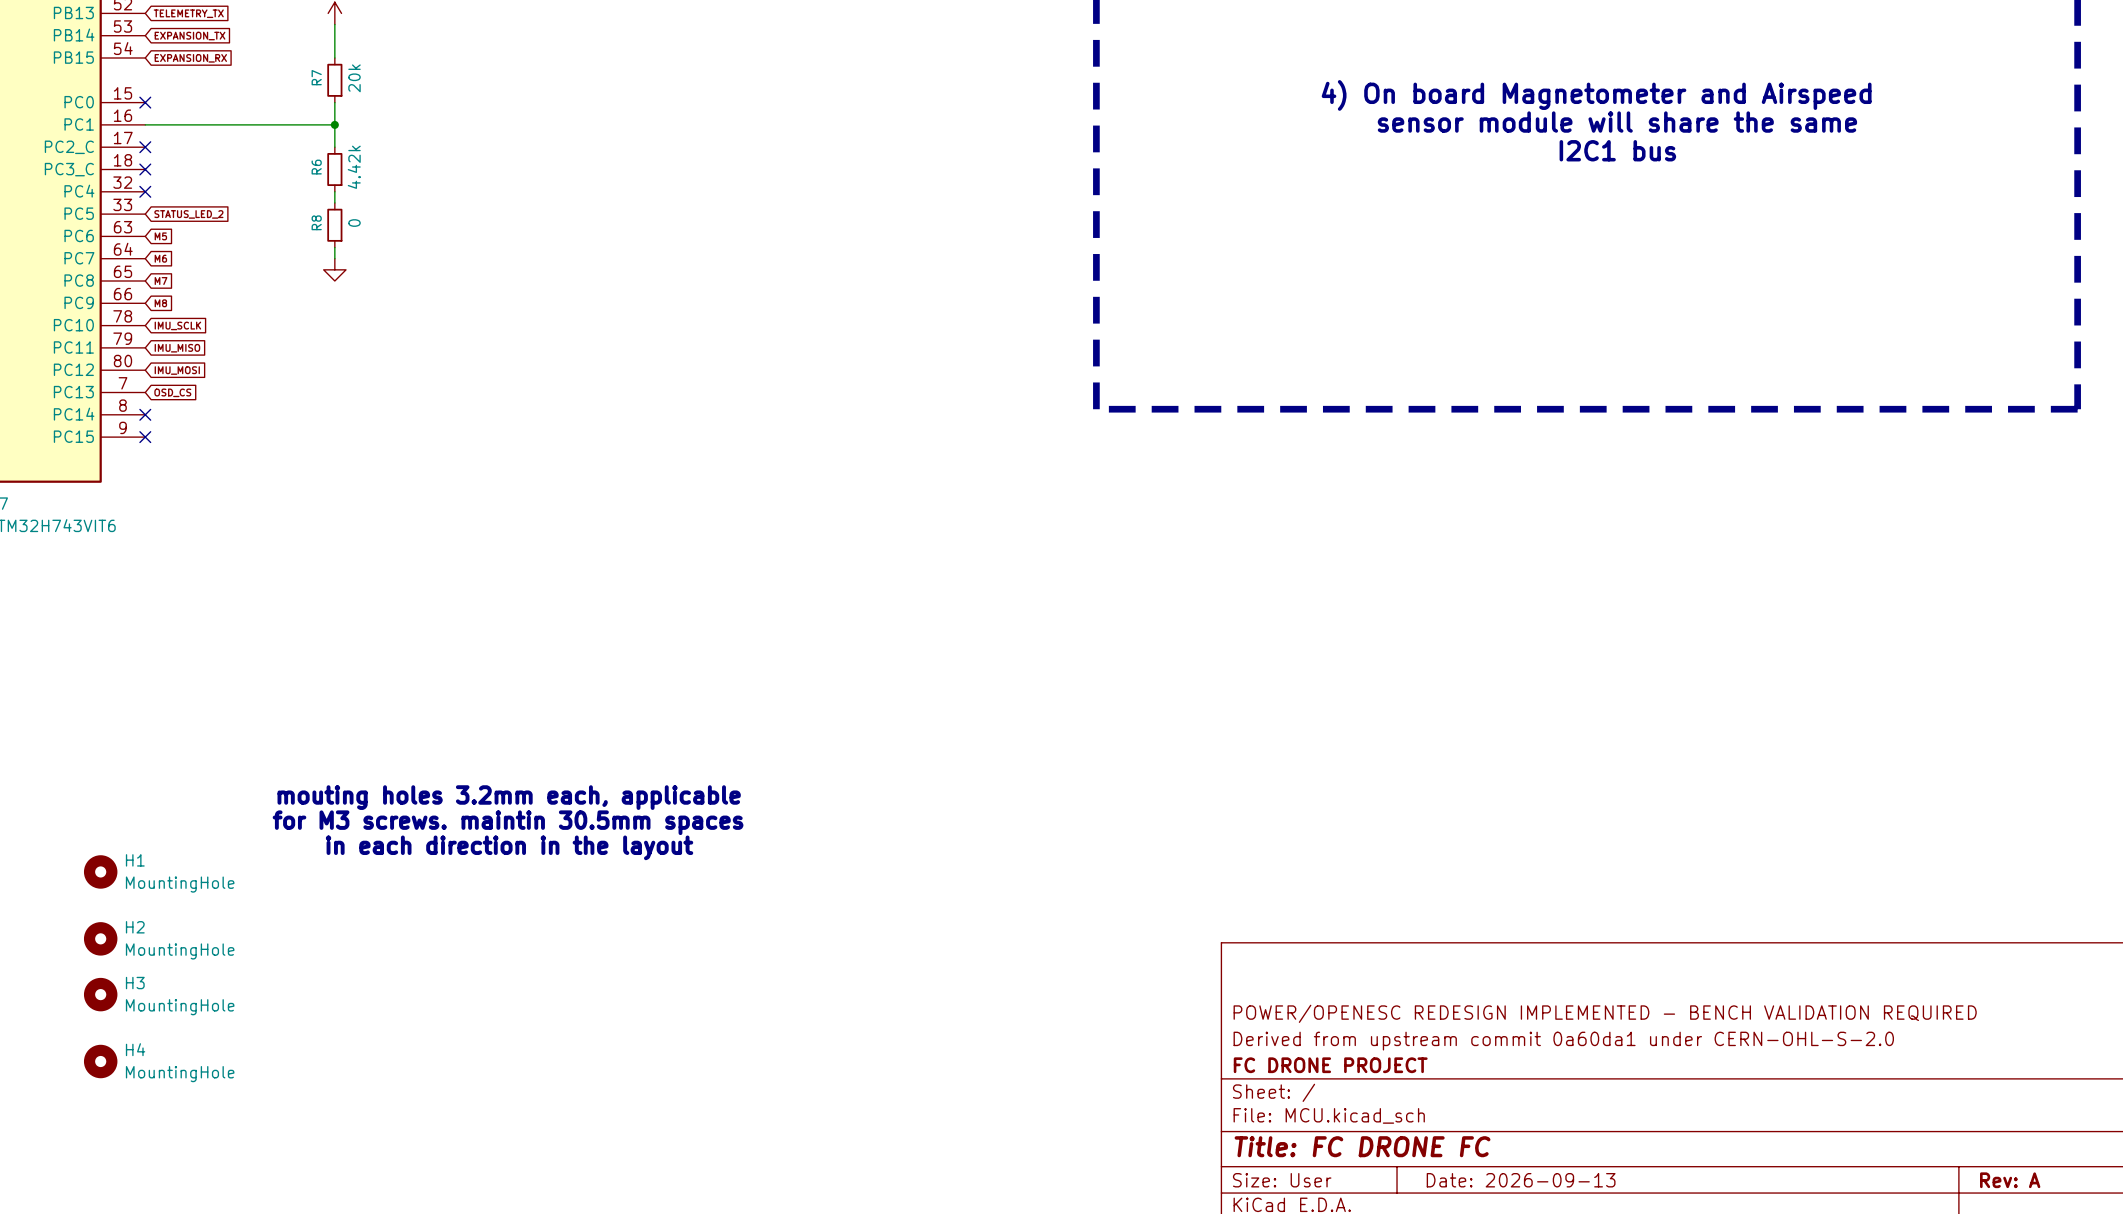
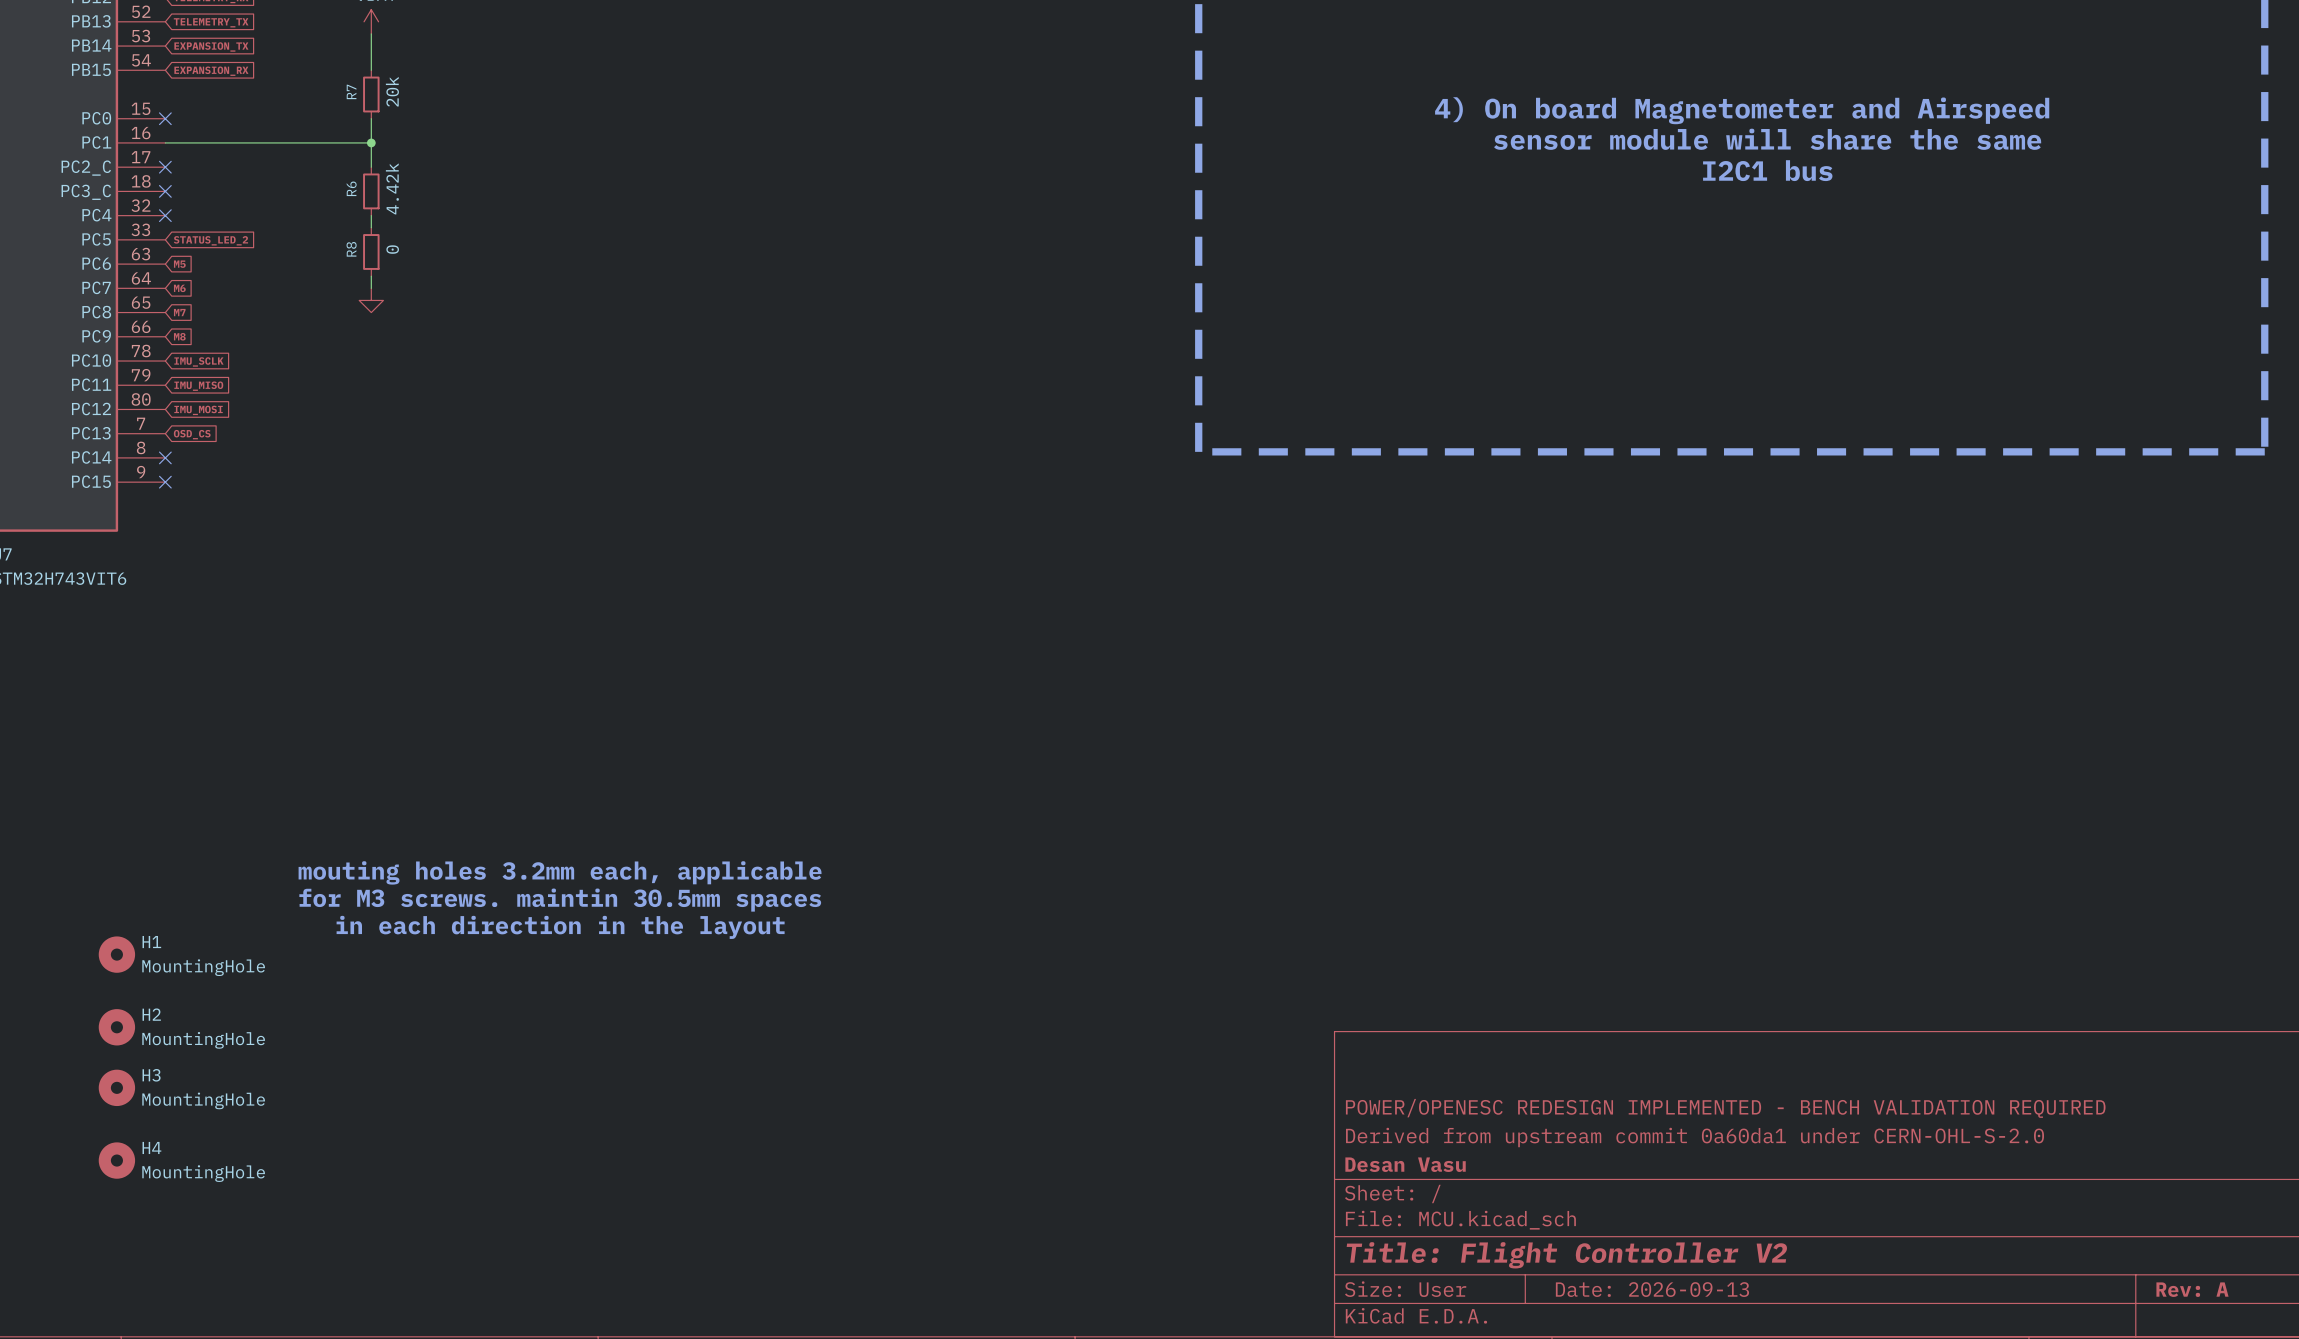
title block: FC DRONE PROJECT (1330, 1065) -> Desan Vasu (1405, 1164)
title block: Title: FC DRONE FC (1362, 1146) -> Title: Flight Controller V2 (1566, 1255)

